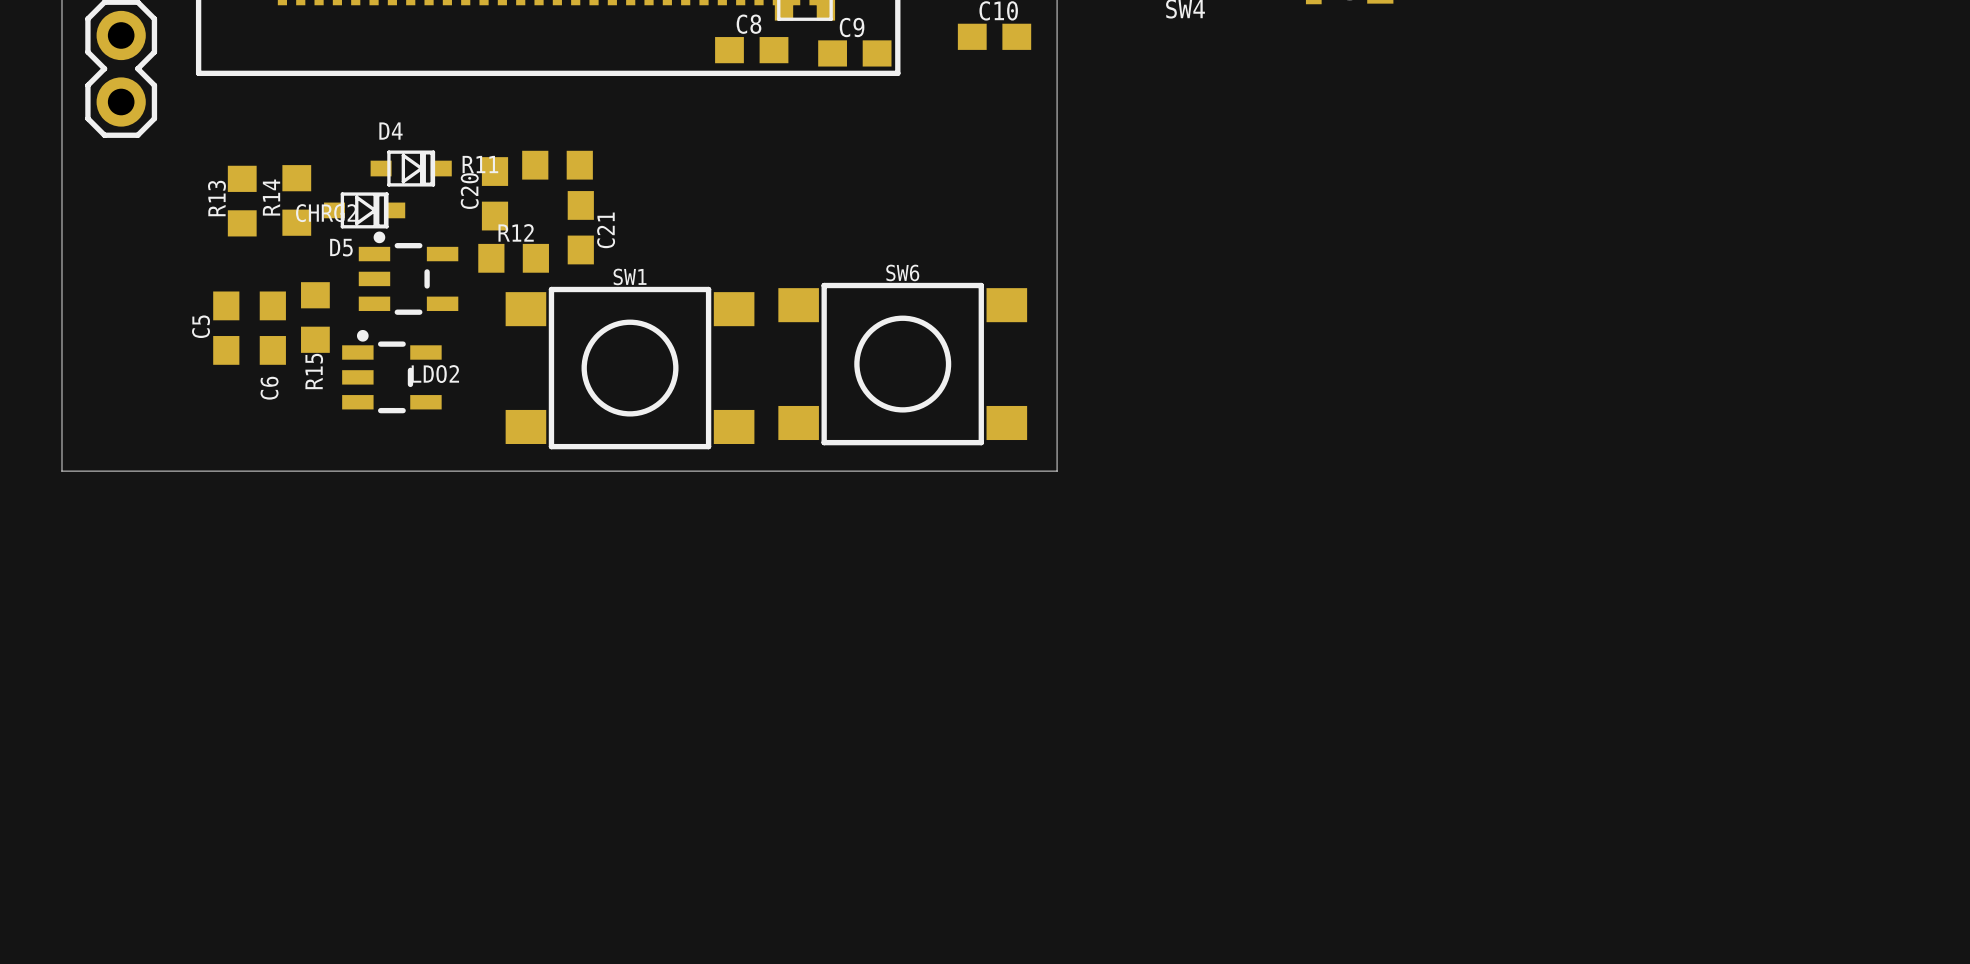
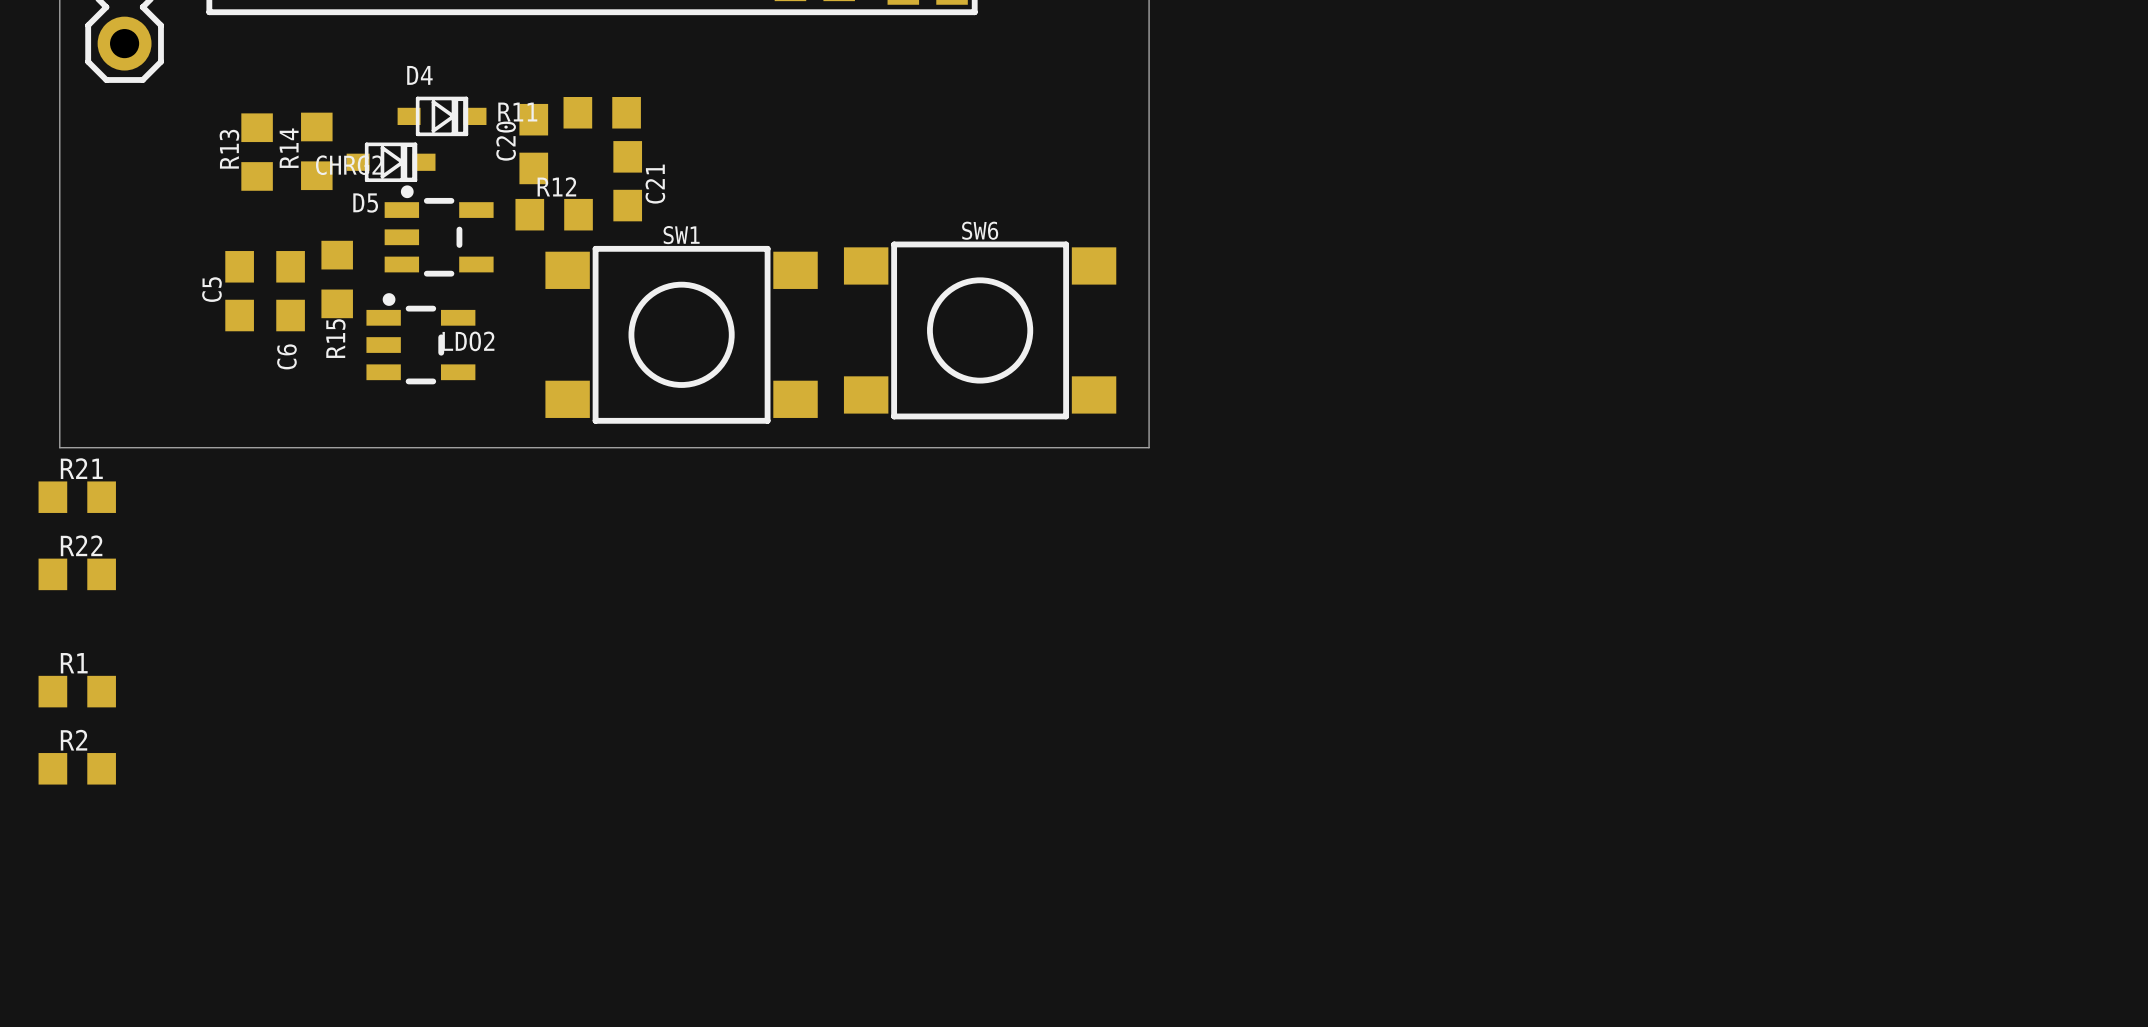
R21: none -> (77, 497)
R22: none -> (77, 574)
R1: none -> (77, 691)
R2: none -> (77, 768)

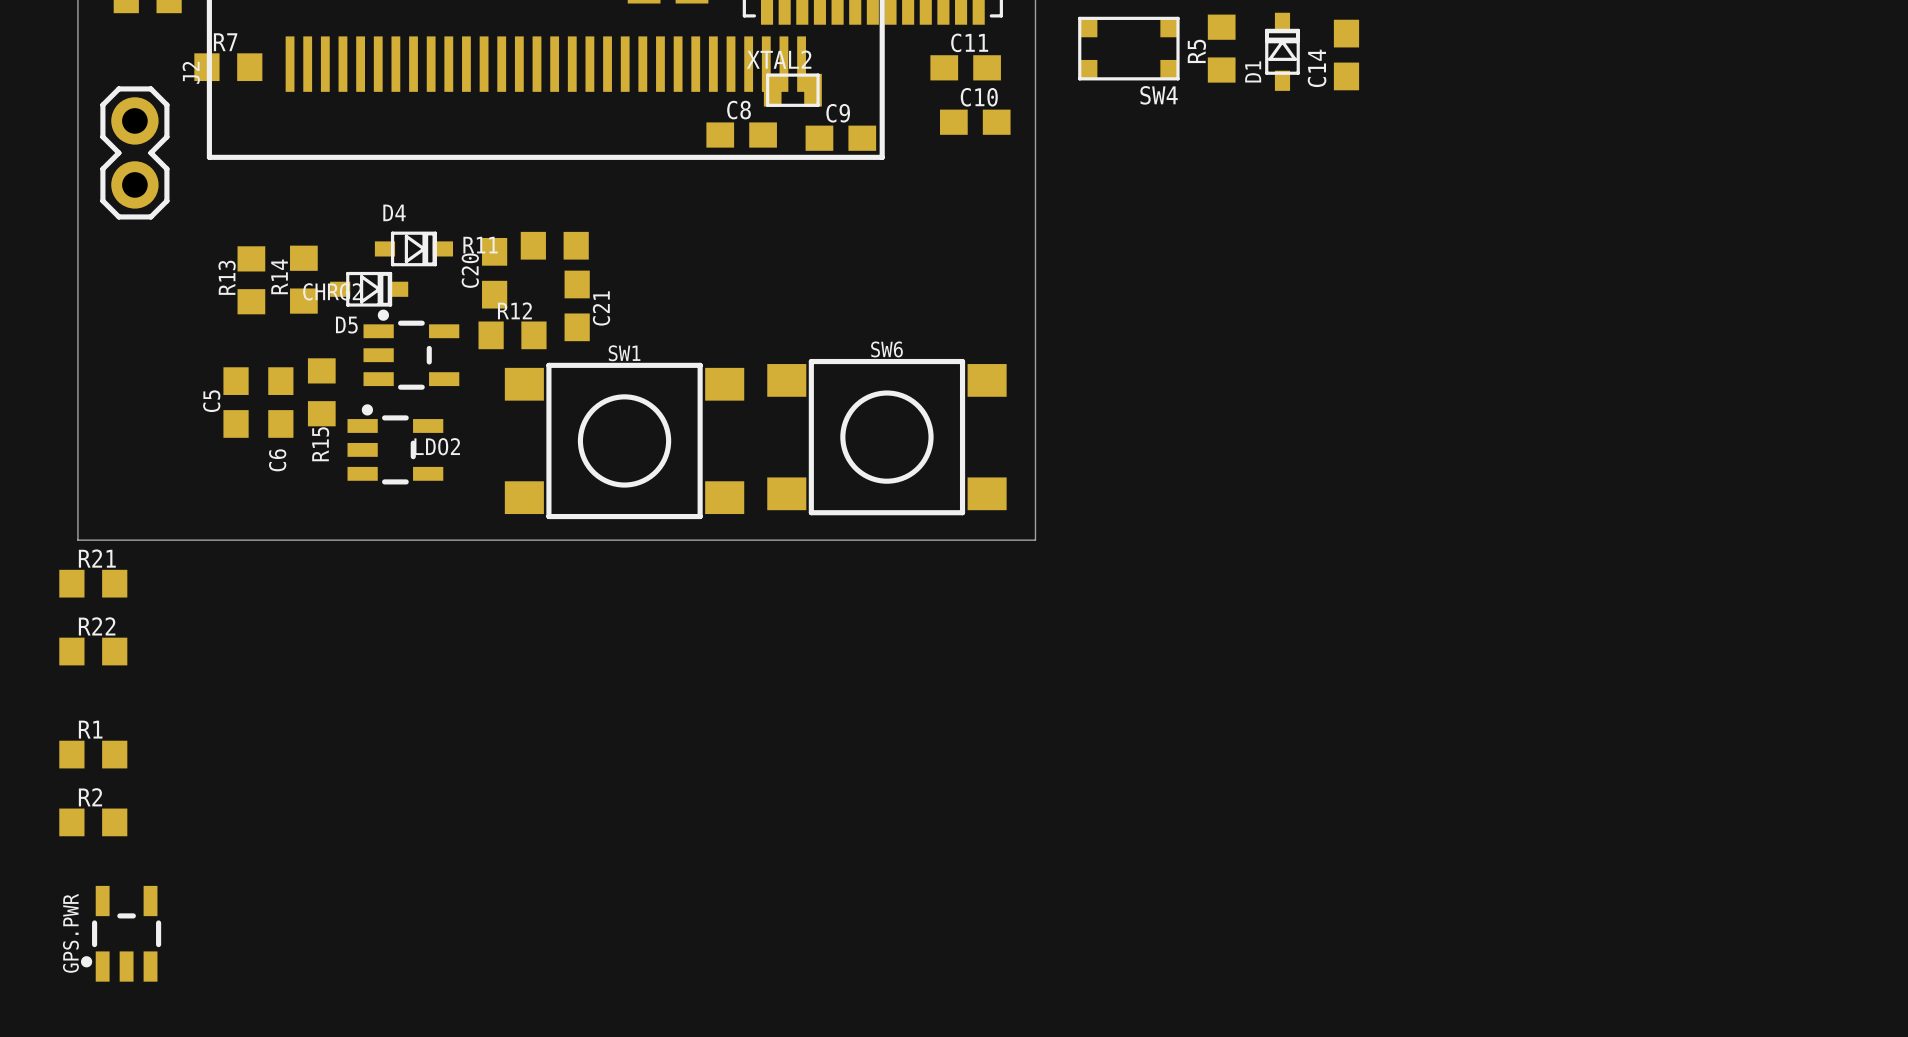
GPS.PWR: none -> (121, 933)

